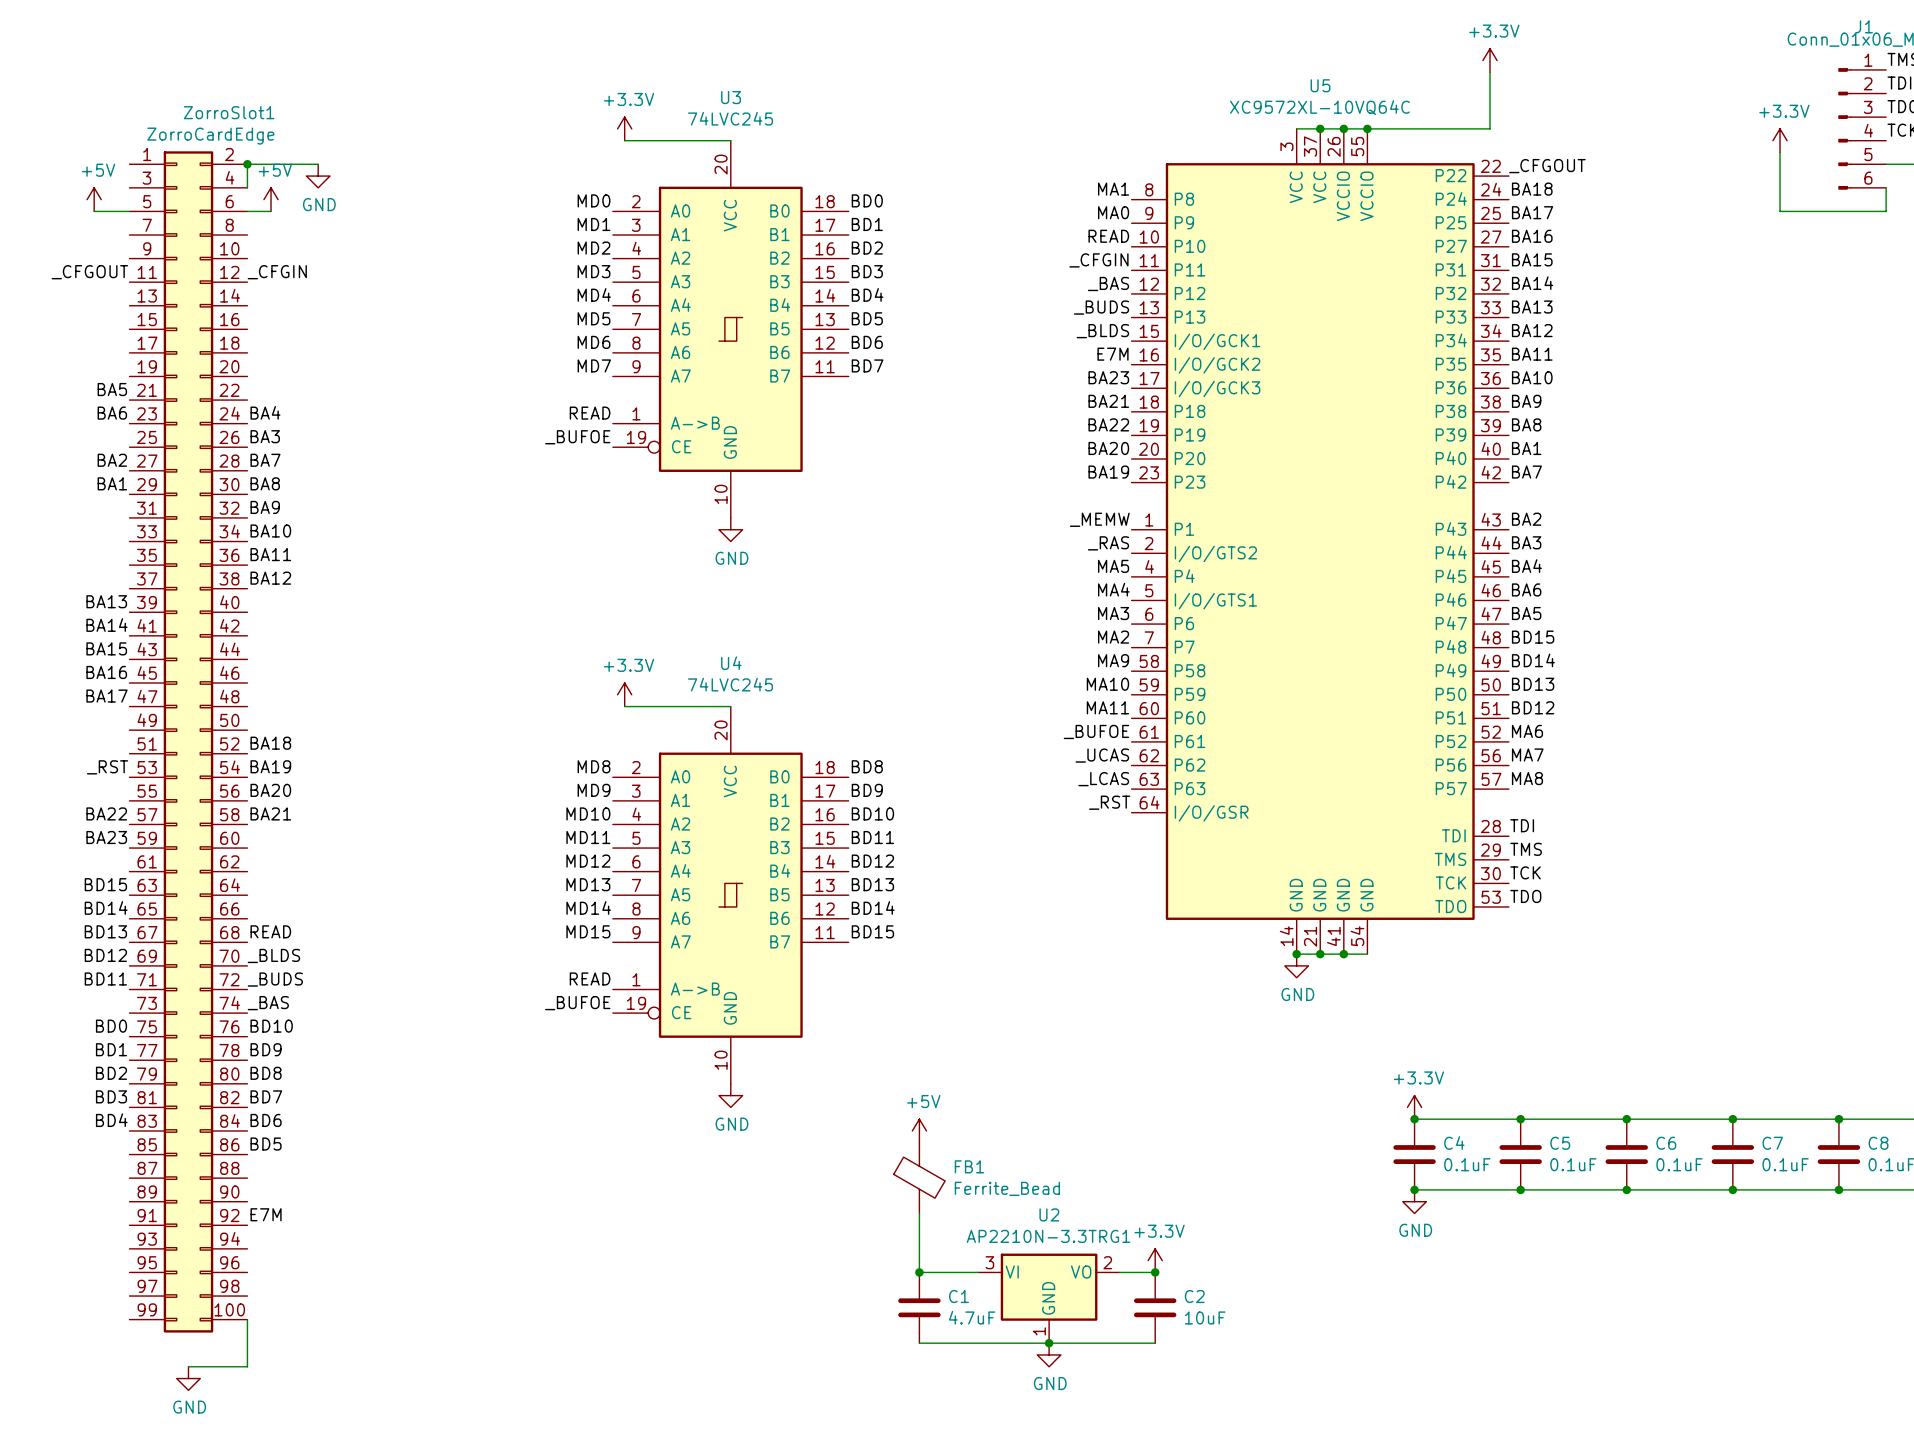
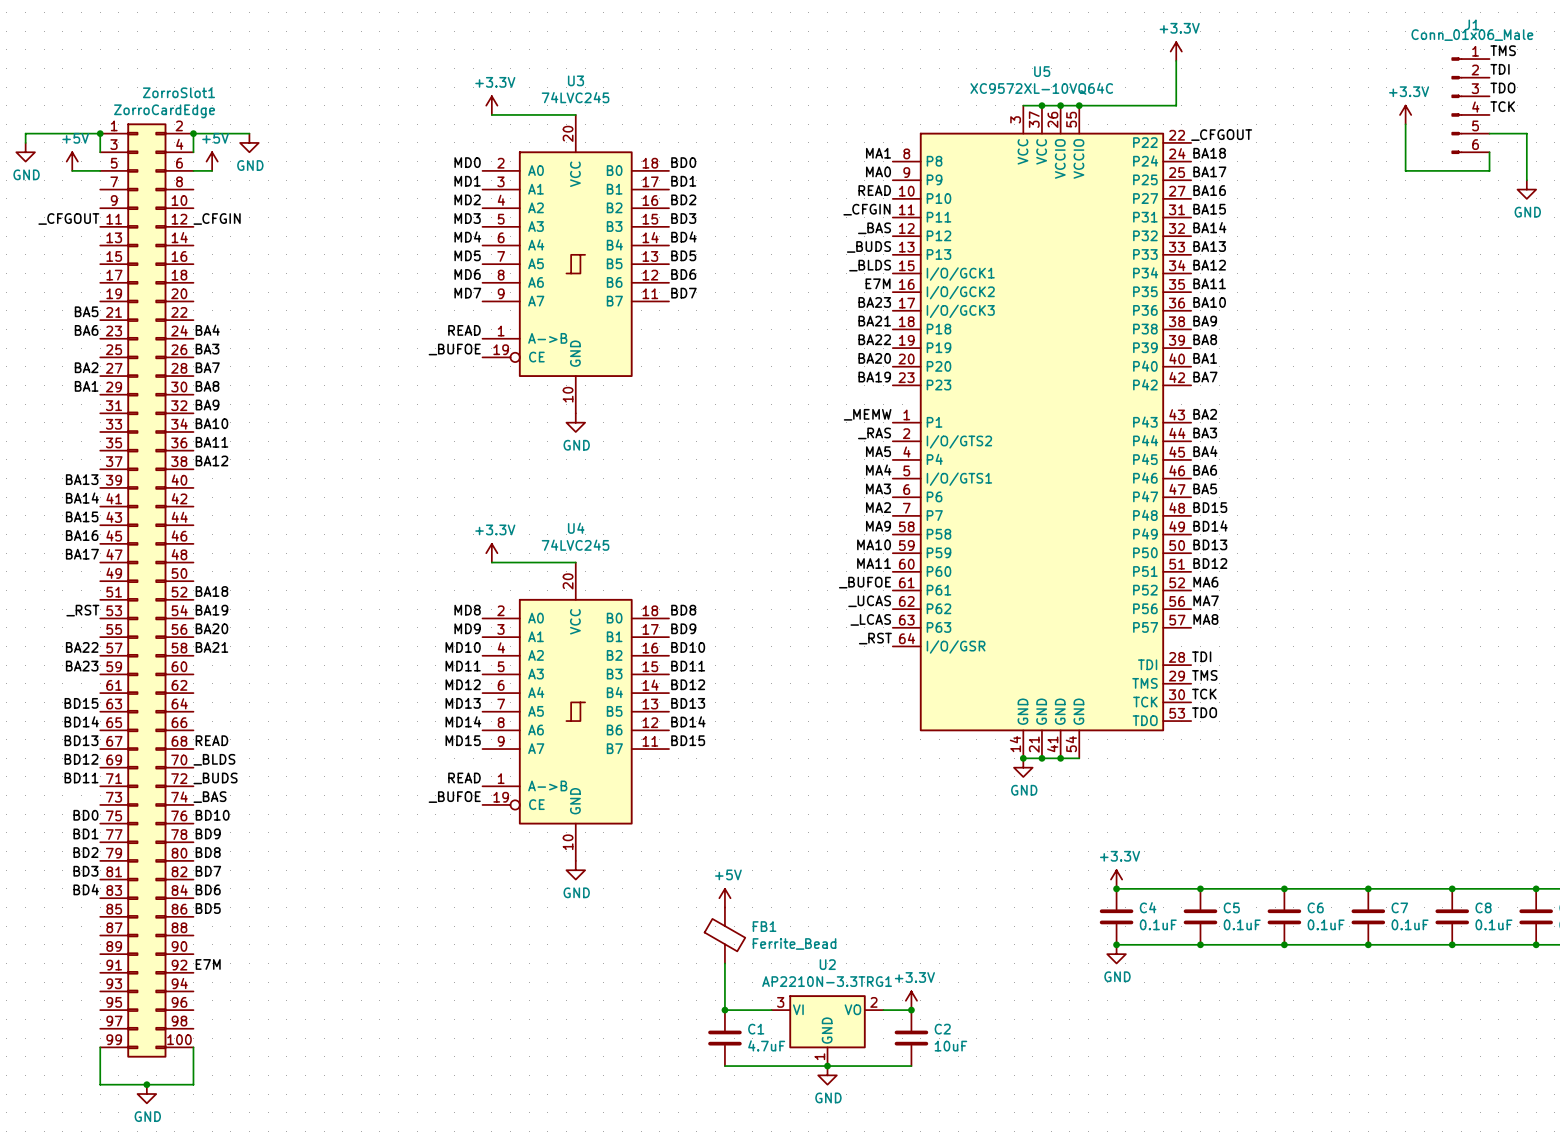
ZorroSlot1 symbol: [129, 151, 248, 1333] -> [100, 123, 337, 1058]
junction: none -> (100, 133)
wire: none -> (25, 142) (25, 133) (100, 133) (100, 152)
power symbol: none -> GND (25, 152)
wire: none -> (100, 1047) (100, 1084) (146, 1084)
junction: none -> (146, 1084)

